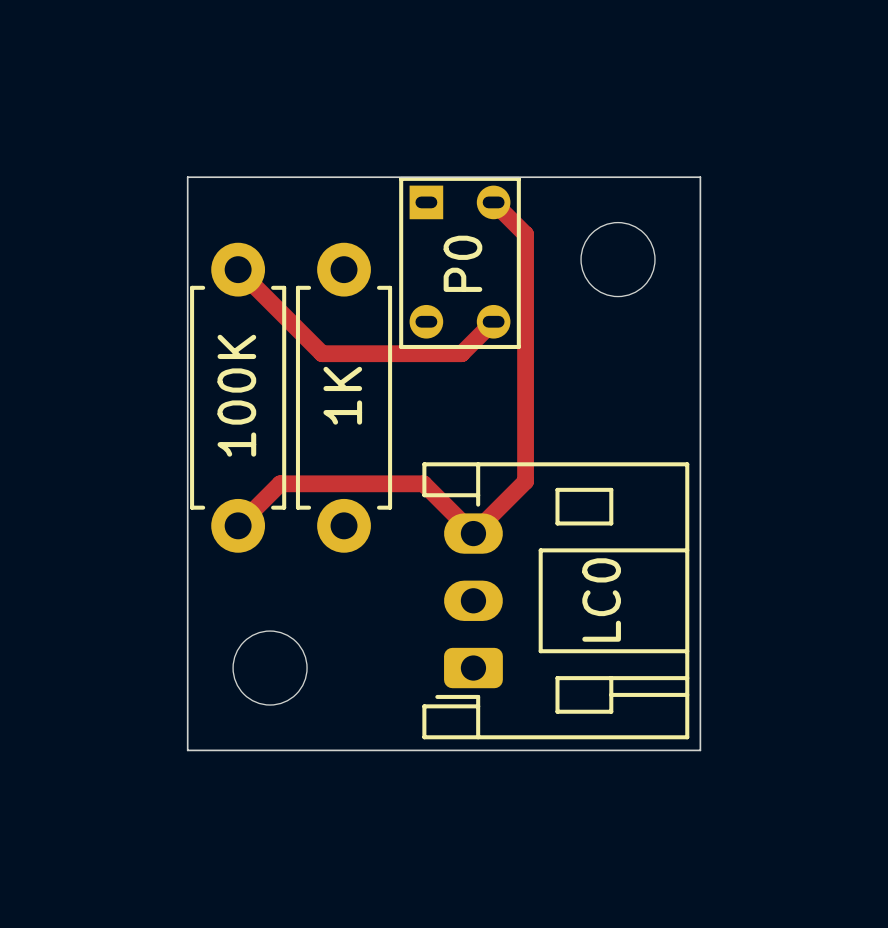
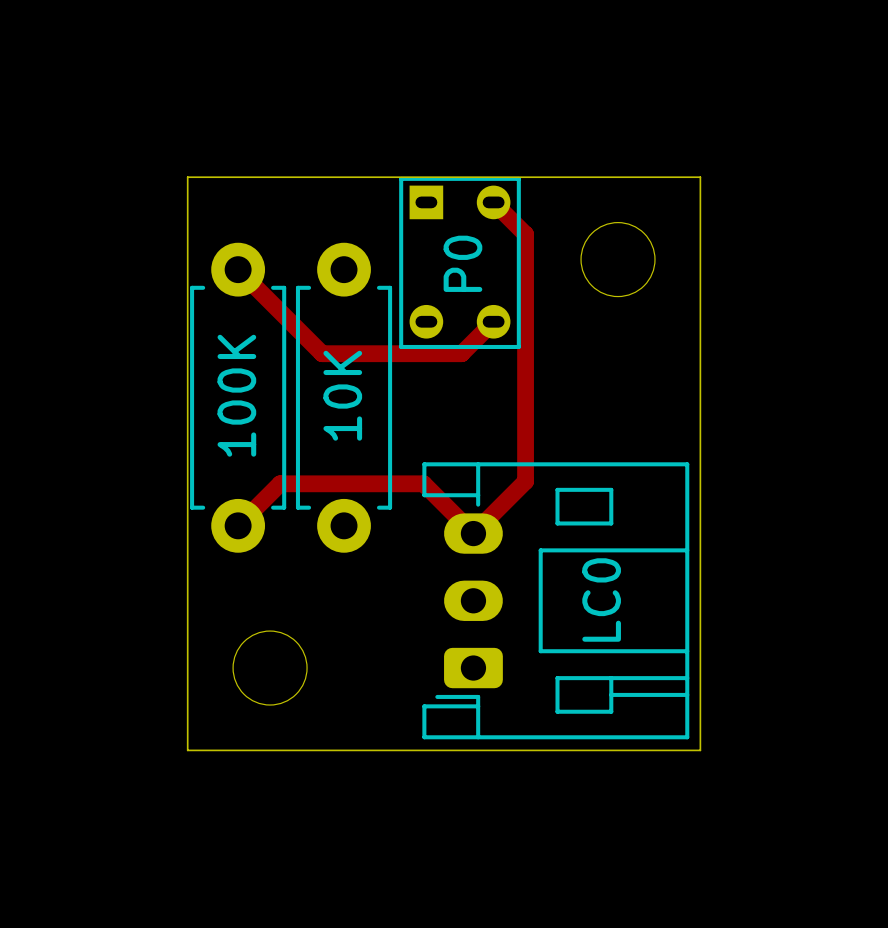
part value: 1K (342, 395) -> 10K (342, 395)

